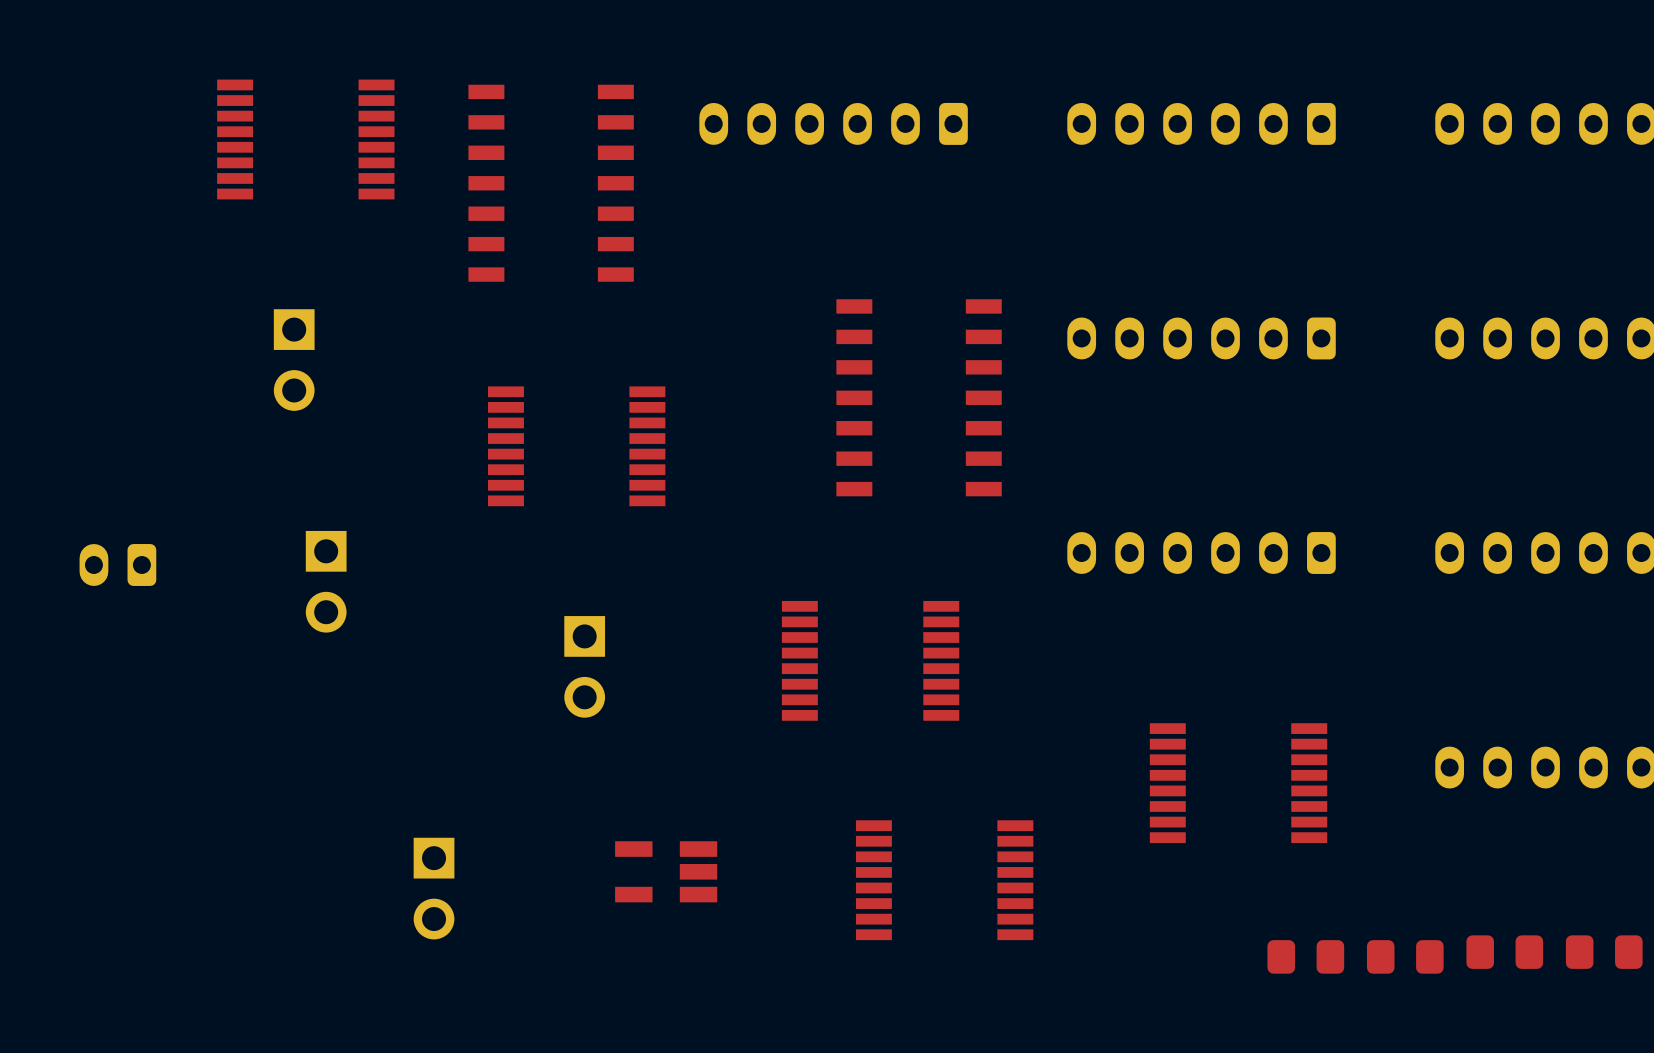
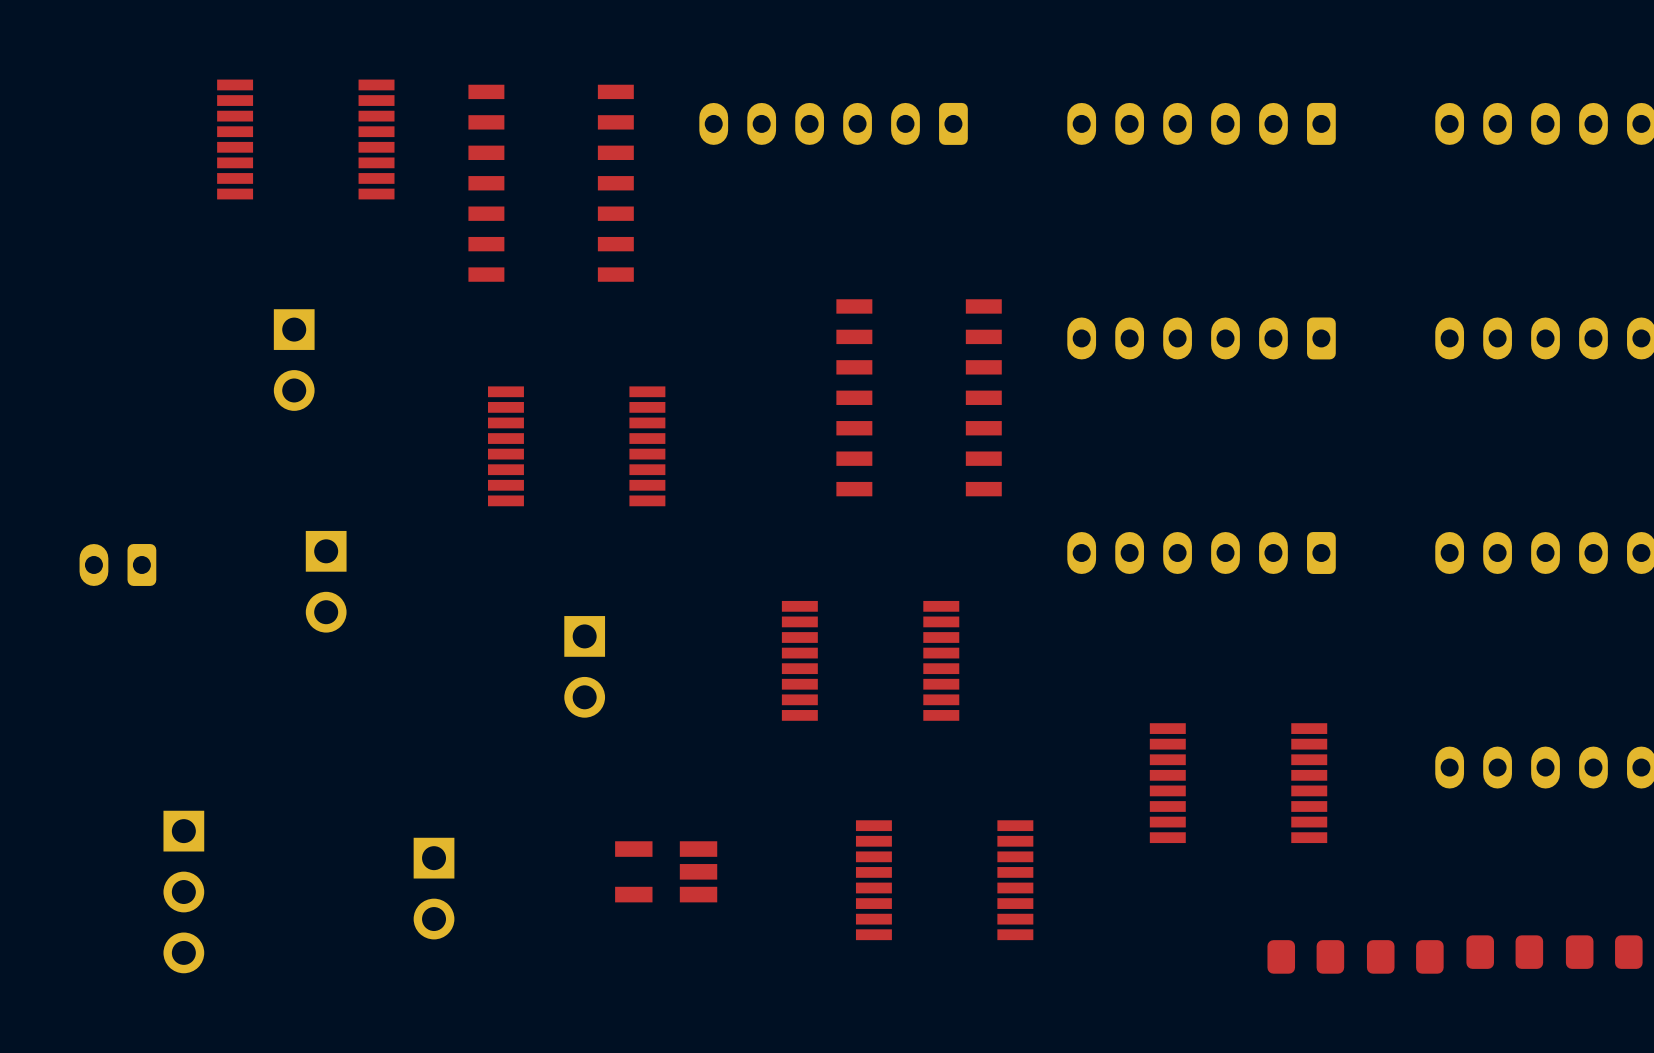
part: none -> (183, 892)

